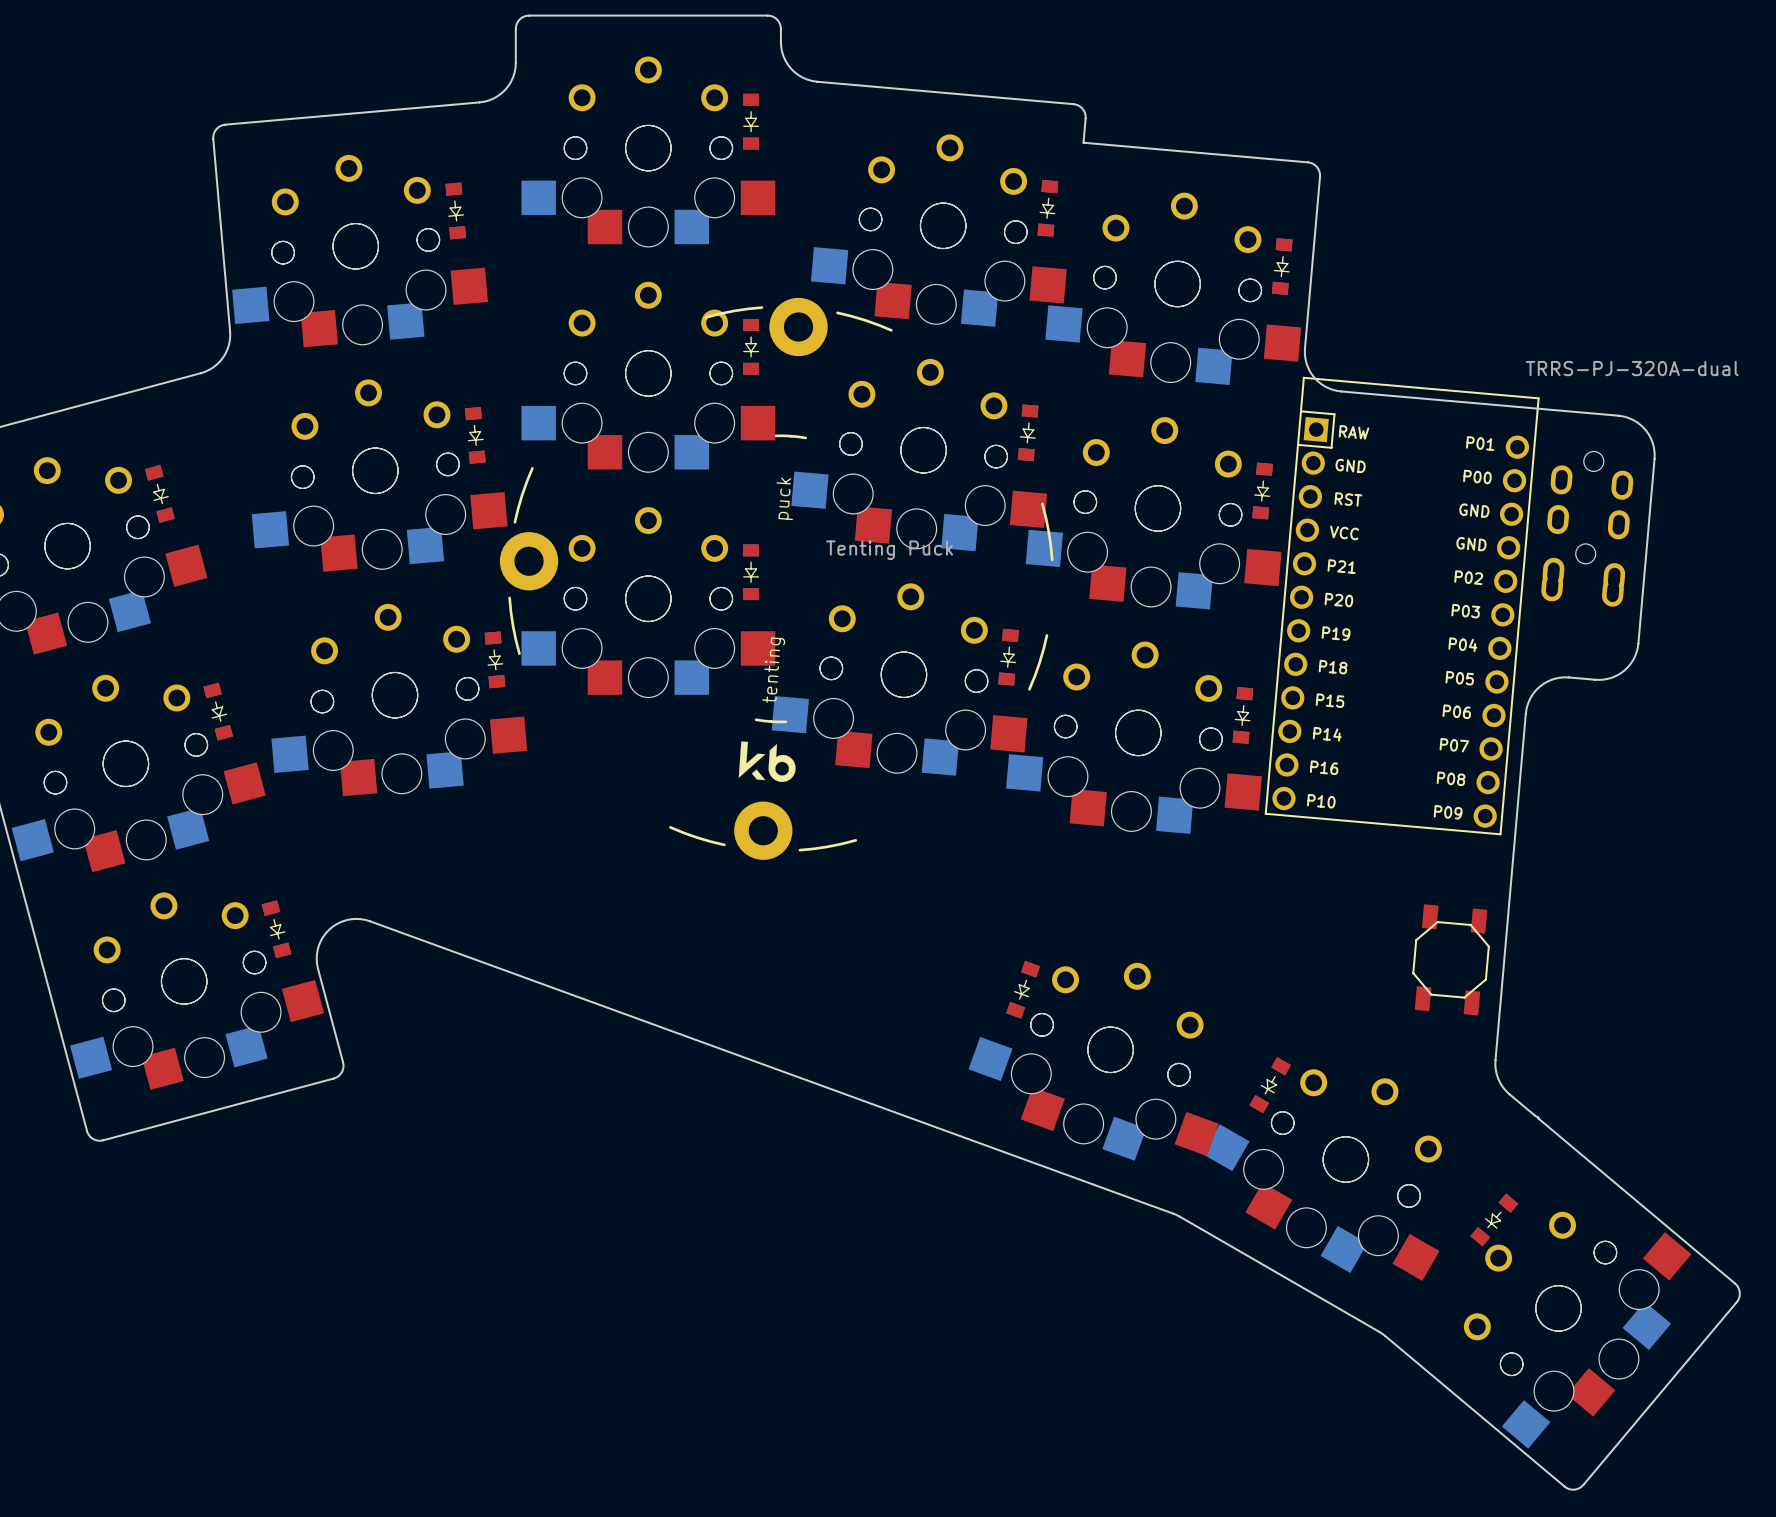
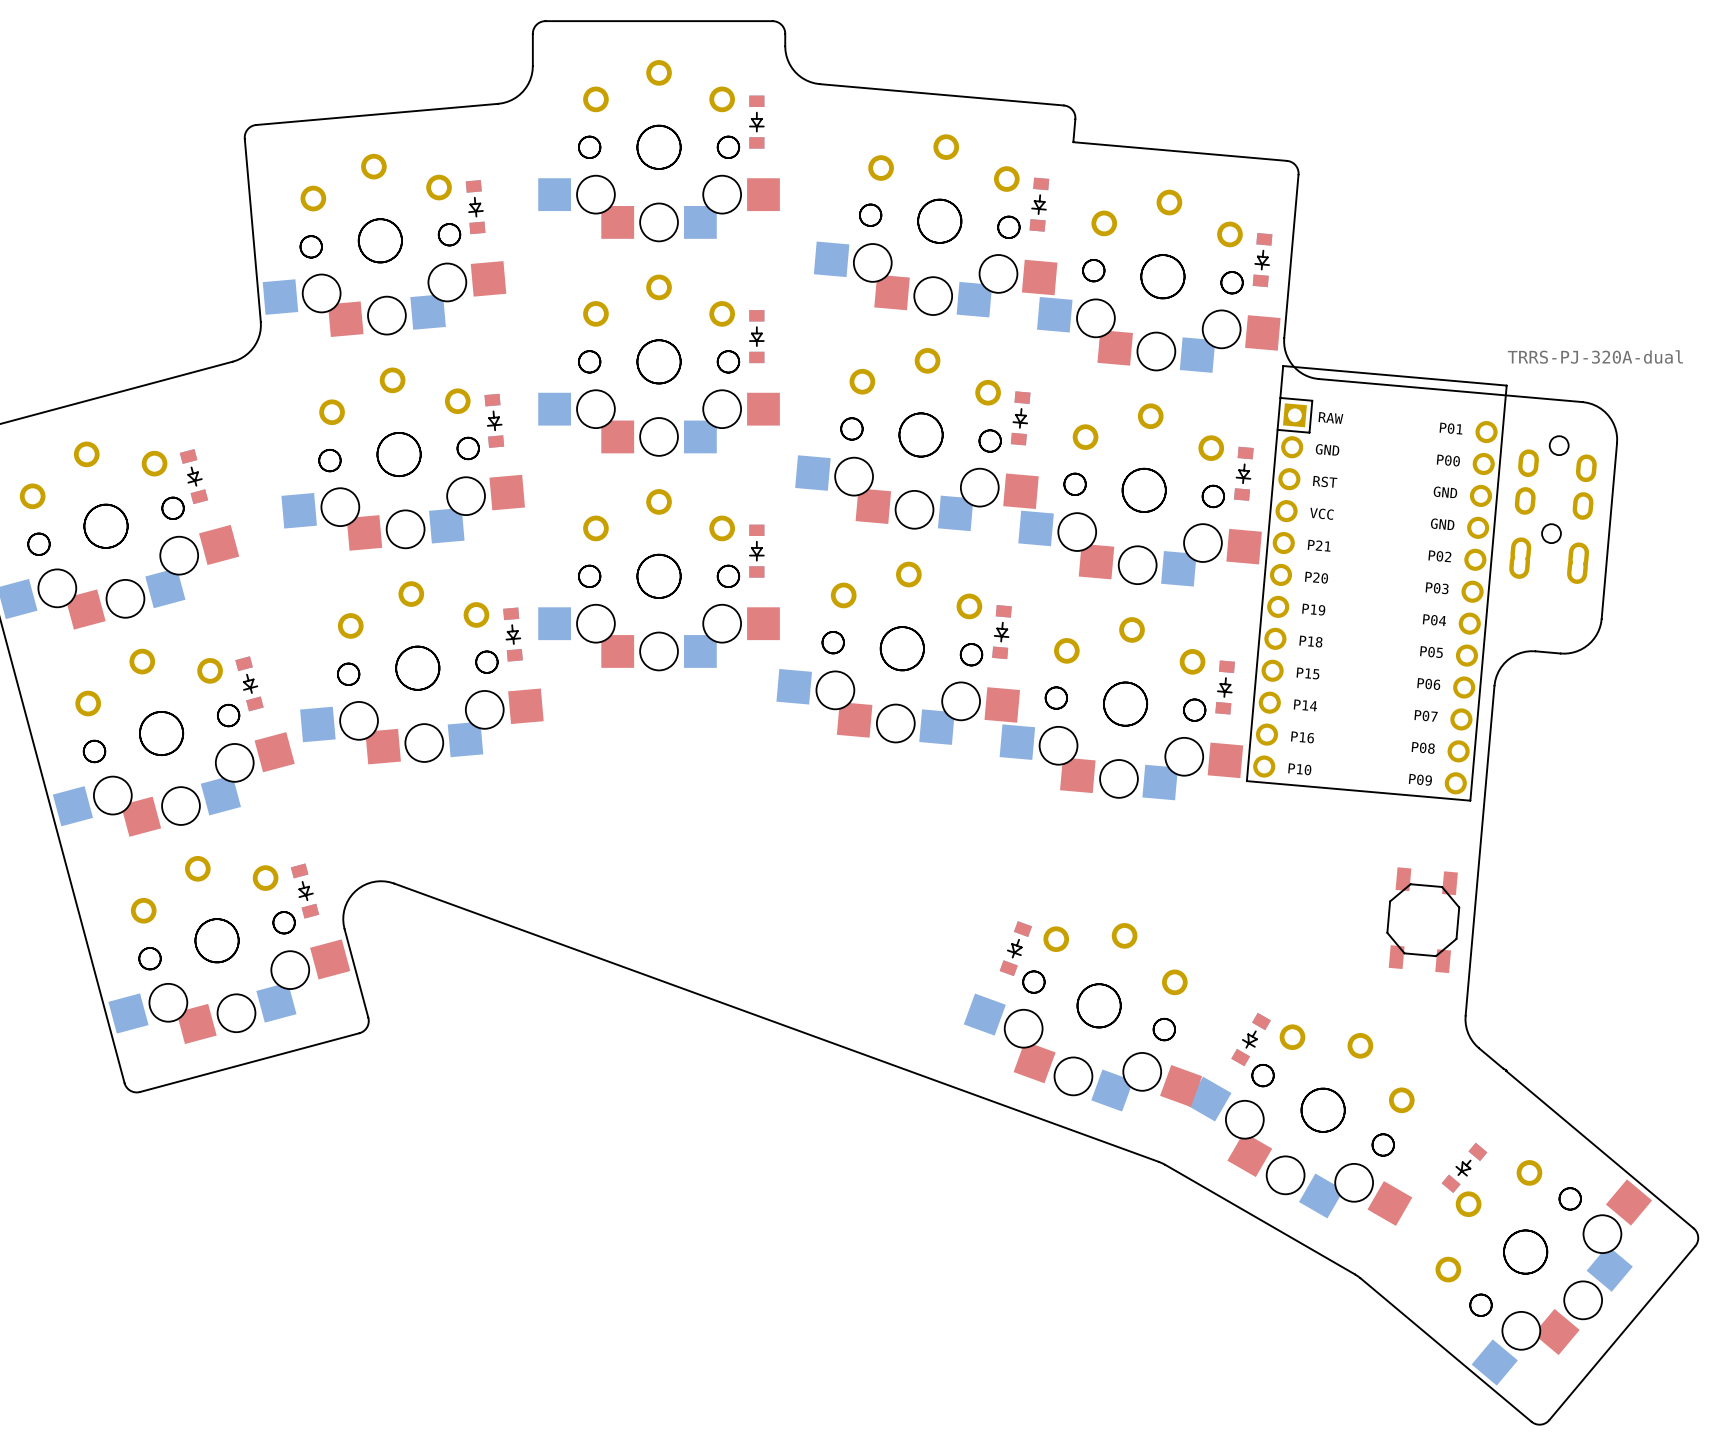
part: Tenting Puck (776, 578) -> none

